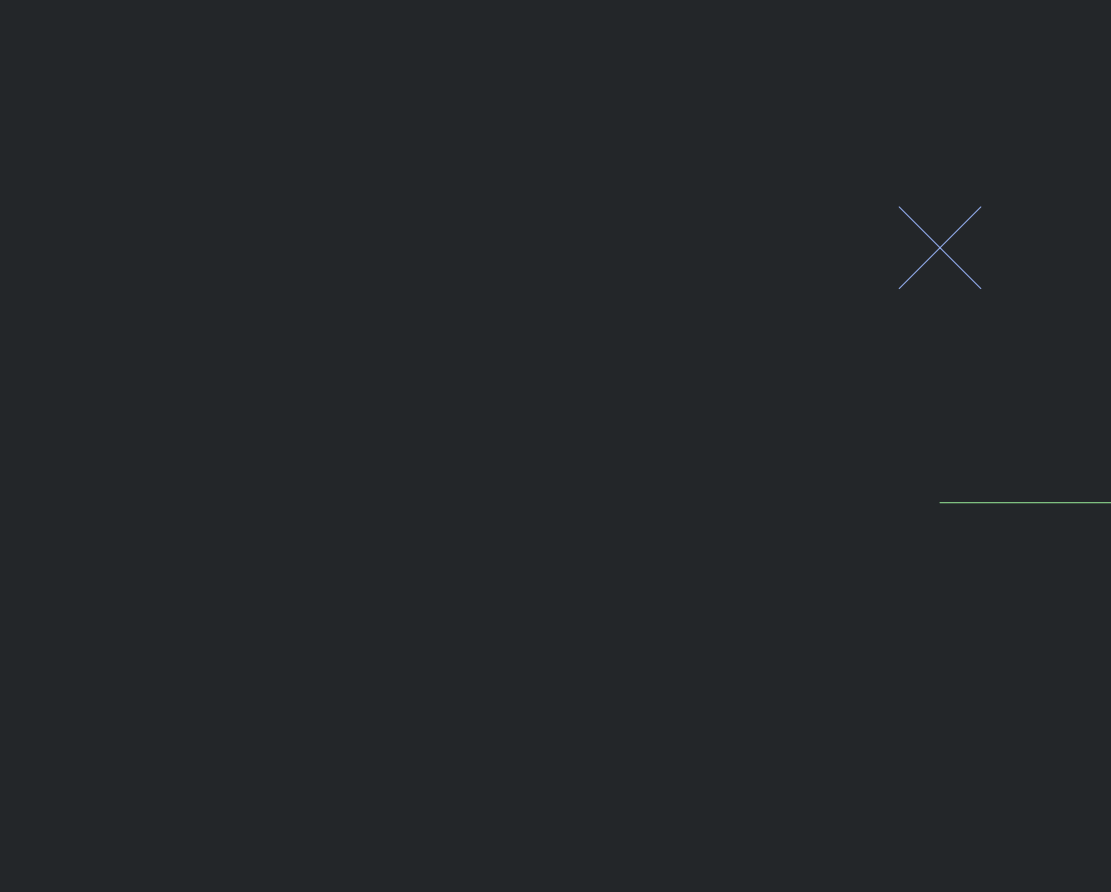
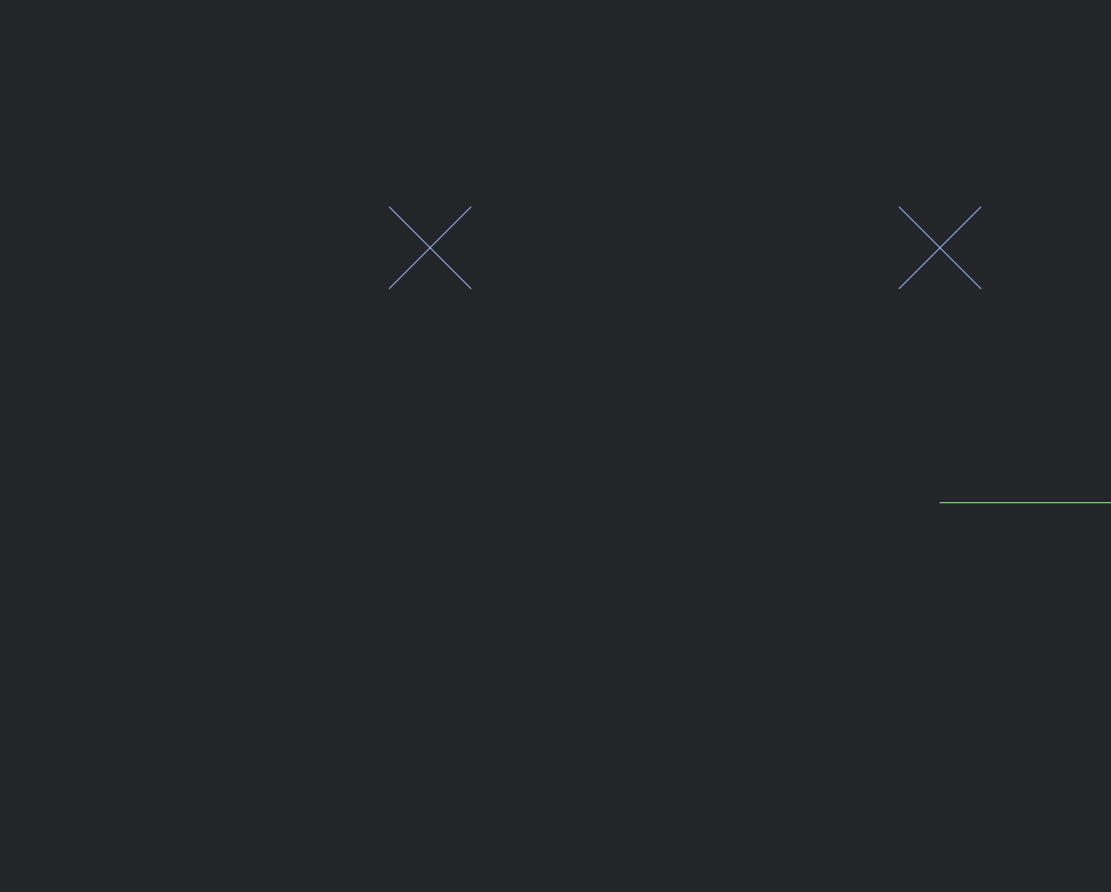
no-connect mark: none -> (430, 247)

